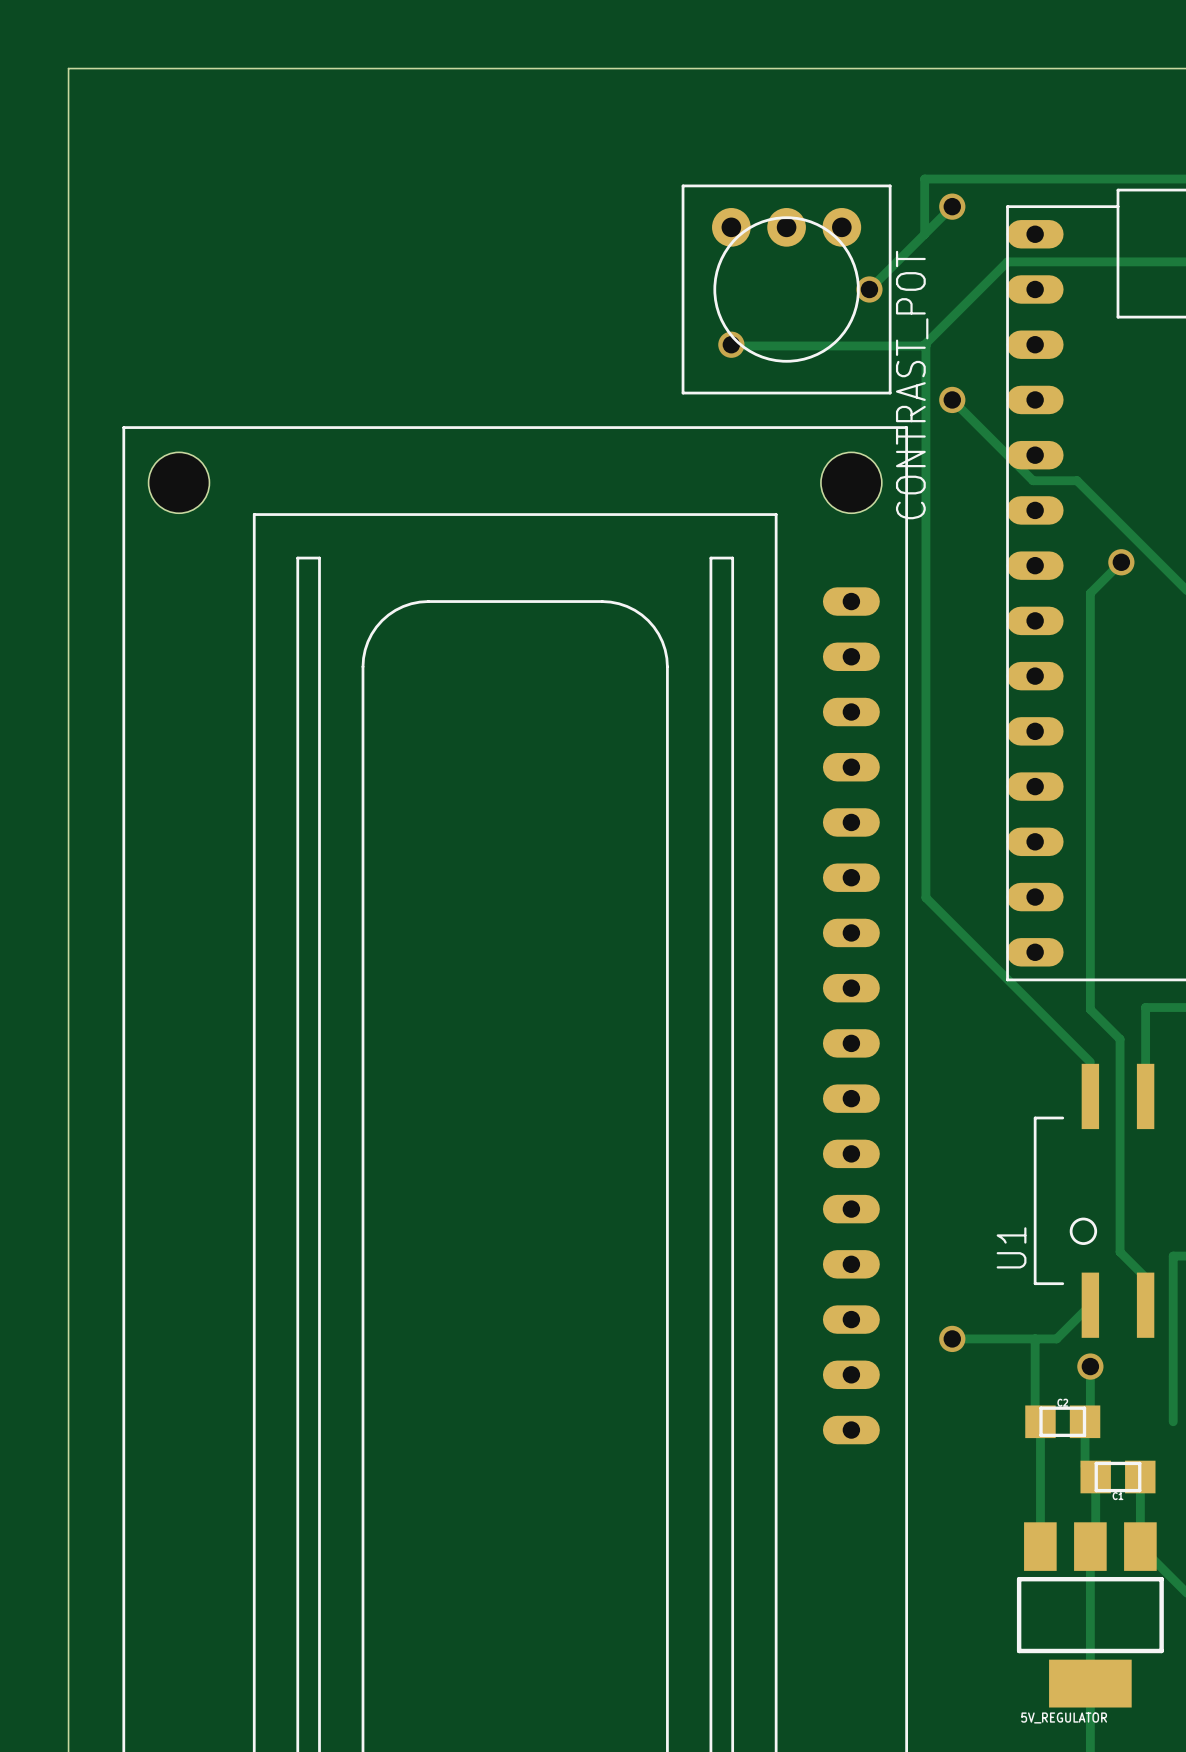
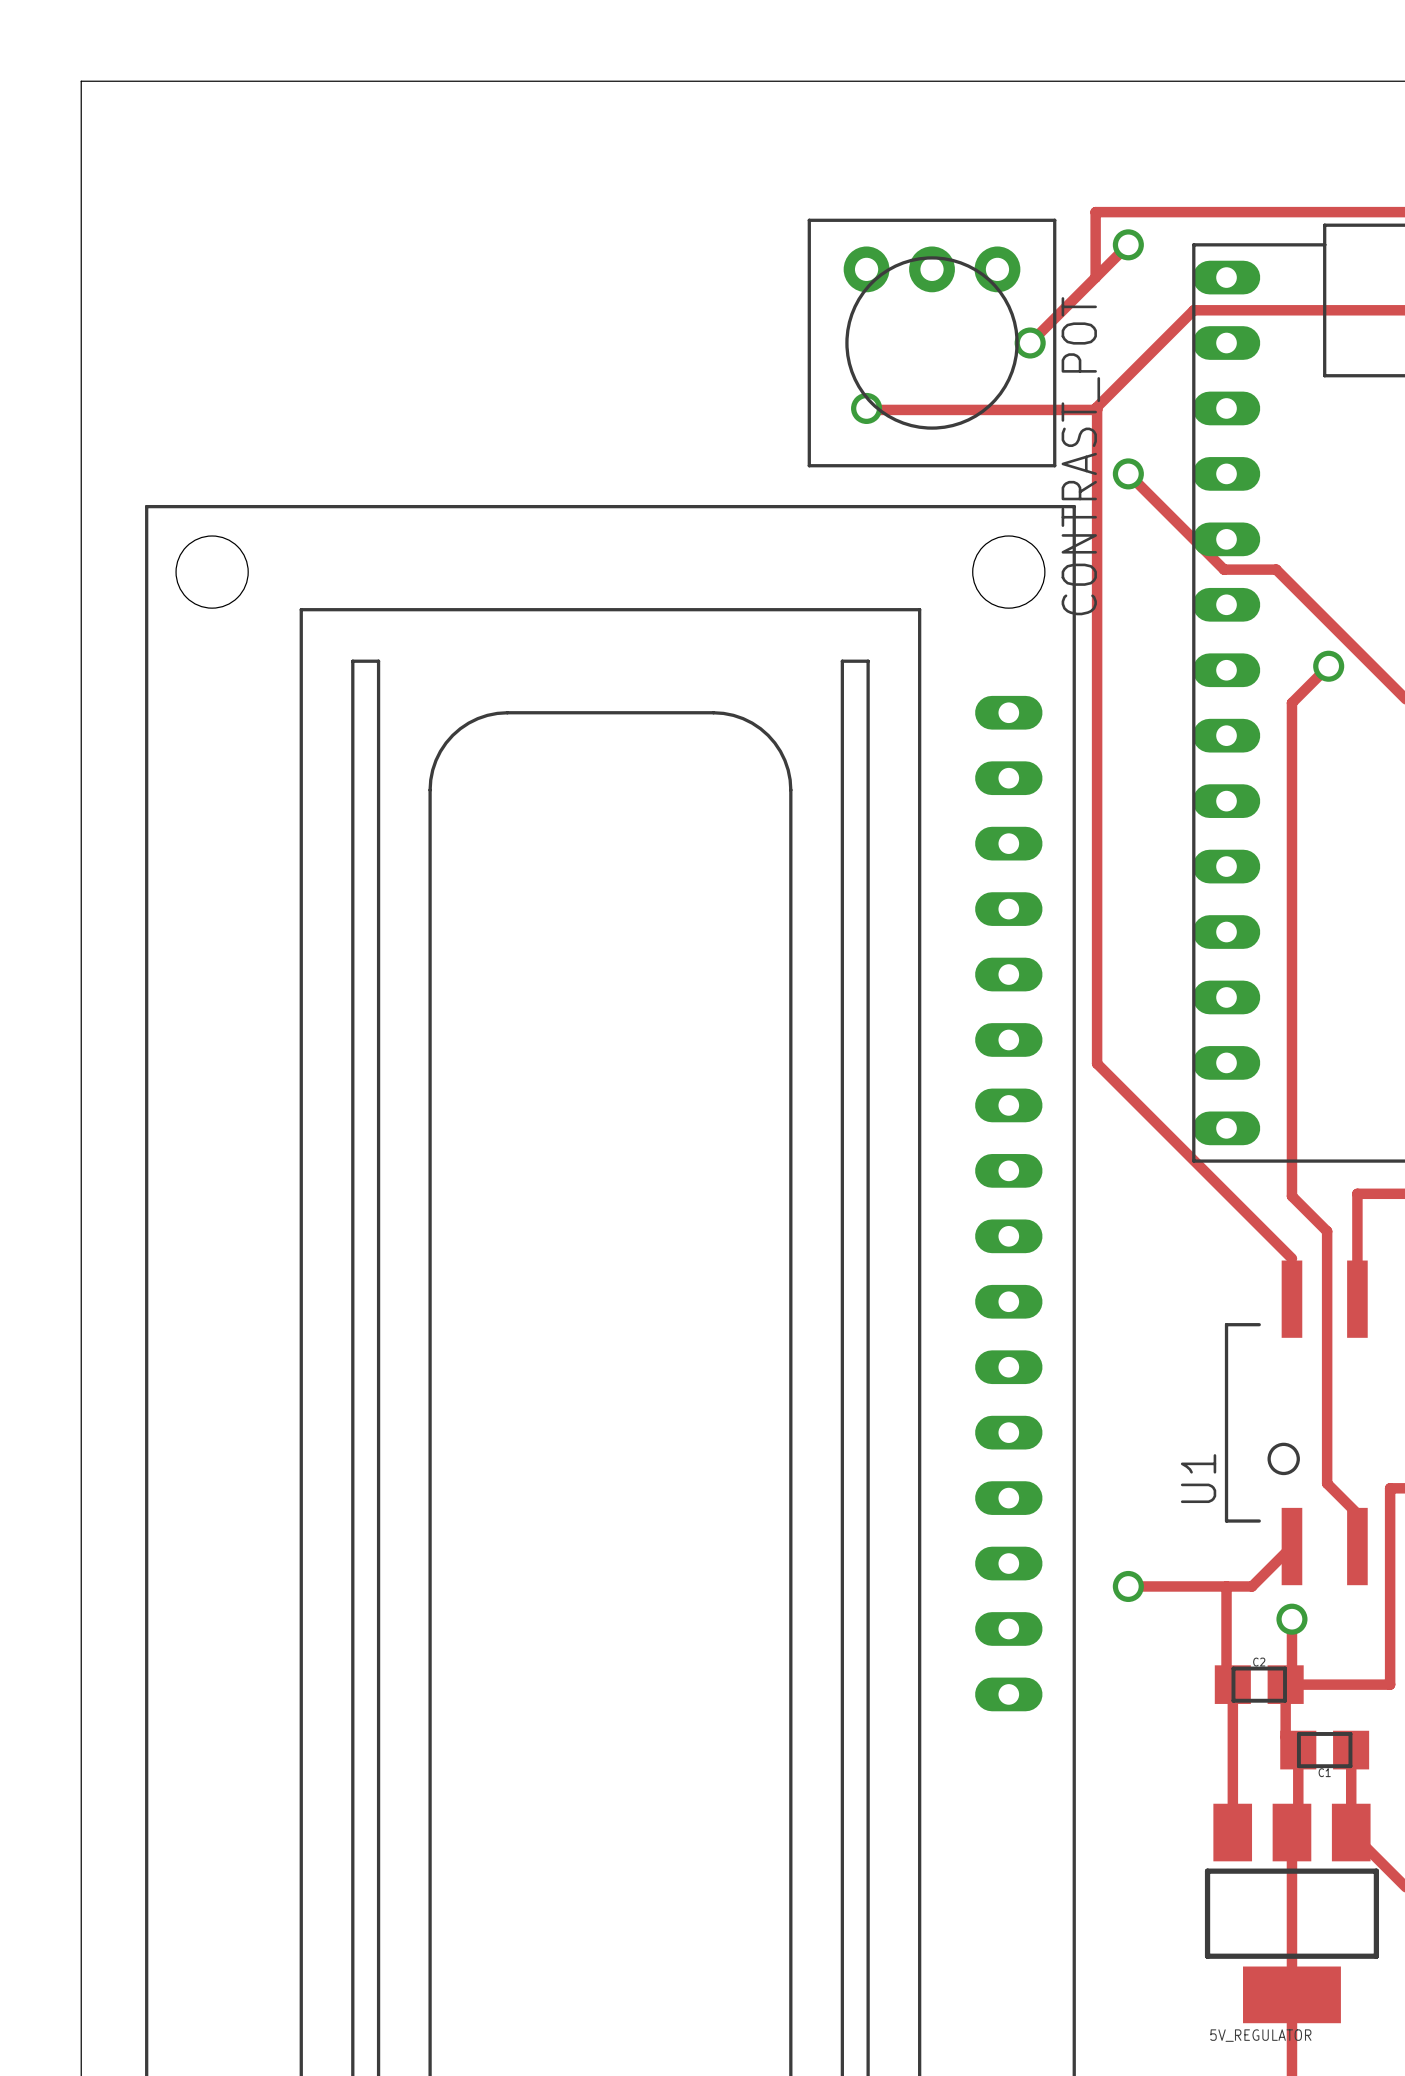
track: none -> (1291, 1678) (1285, 1684) (1390, 1684)

